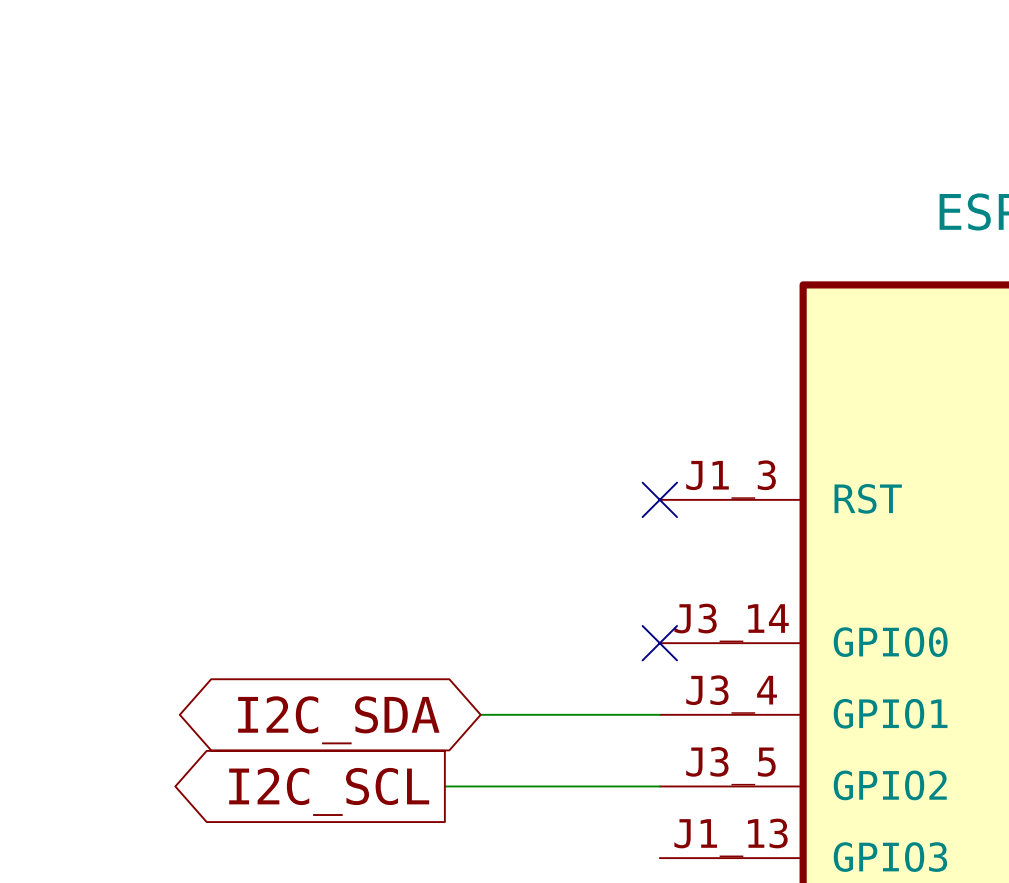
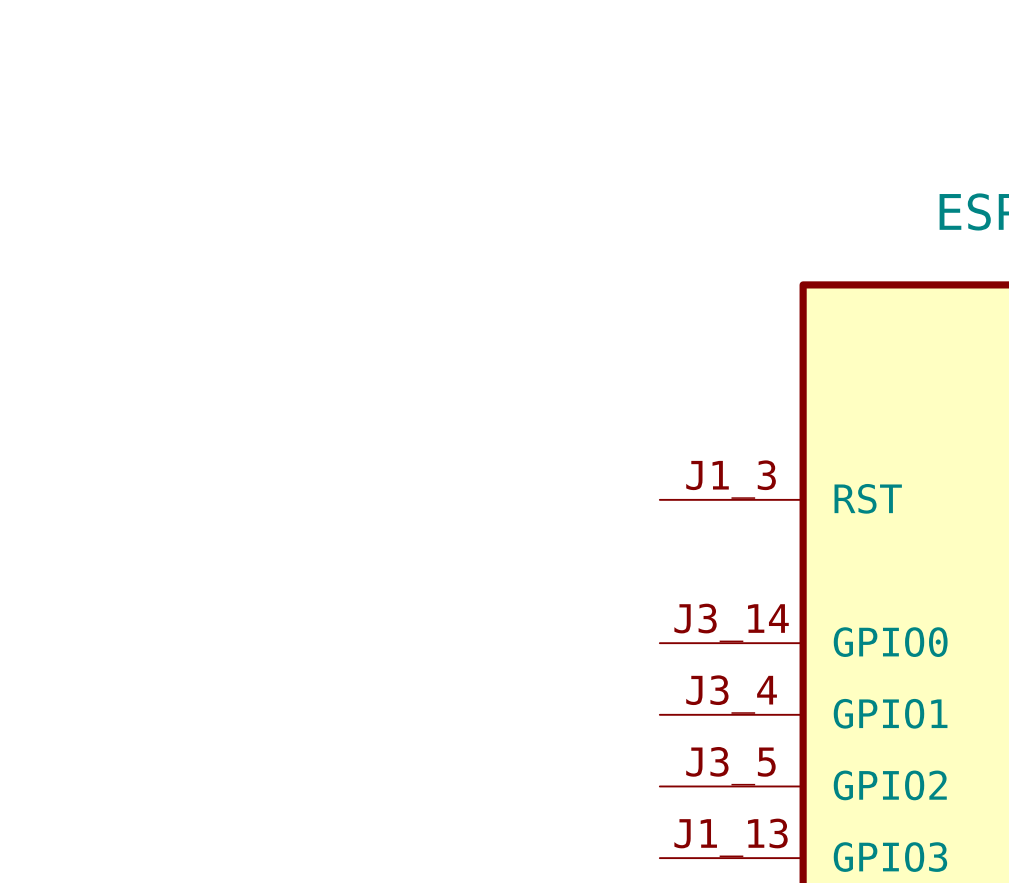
no-connect mark: (659, 499) -> none
no-connect mark: (659, 643) -> none
wire: (480, 714) (659, 714) -> none
global label: I2C_SDA (338, 720) -> none
wire: (444, 786) (659, 786) -> none
global label: I2C_SCL (329, 791) -> none

